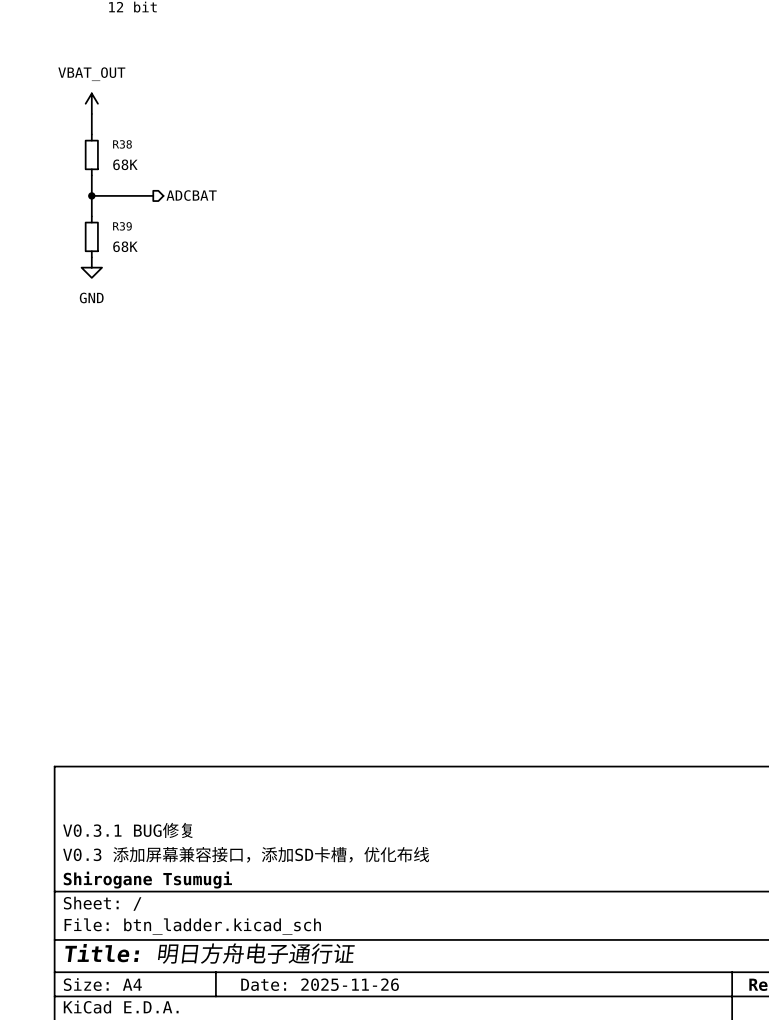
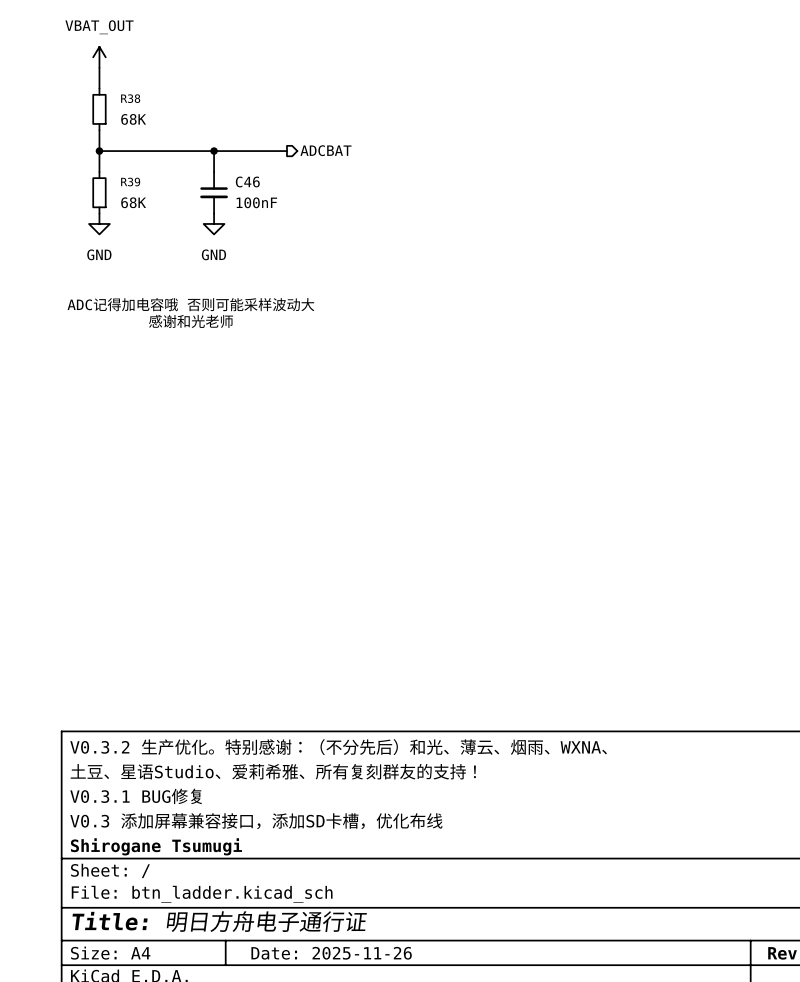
wire: none -> (161, 151) (286, 151)
hierarchical label position: ADCBAT (191, 195) -> ADCBAT (325, 150)
wire: none -> (214, 151) (214, 171)
junction: none -> (214, 151)
C46: none -> 100nF (214, 192)
power symbol: none -> GND (214, 223)
text: none -> ADC记得加电容哦 否则可能采样波动大 (190, 304)
text: none -> 感谢和光老师 (190, 321)
title block: none -> V0.3.2 生产优化。特别感谢：（不分先后）和光、薄云、烟雨、WXNA、 (338, 747)
title block: none -> 土豆、星语Studio、爱莉希雅、所有复刻群友的支持！ (273, 771)

